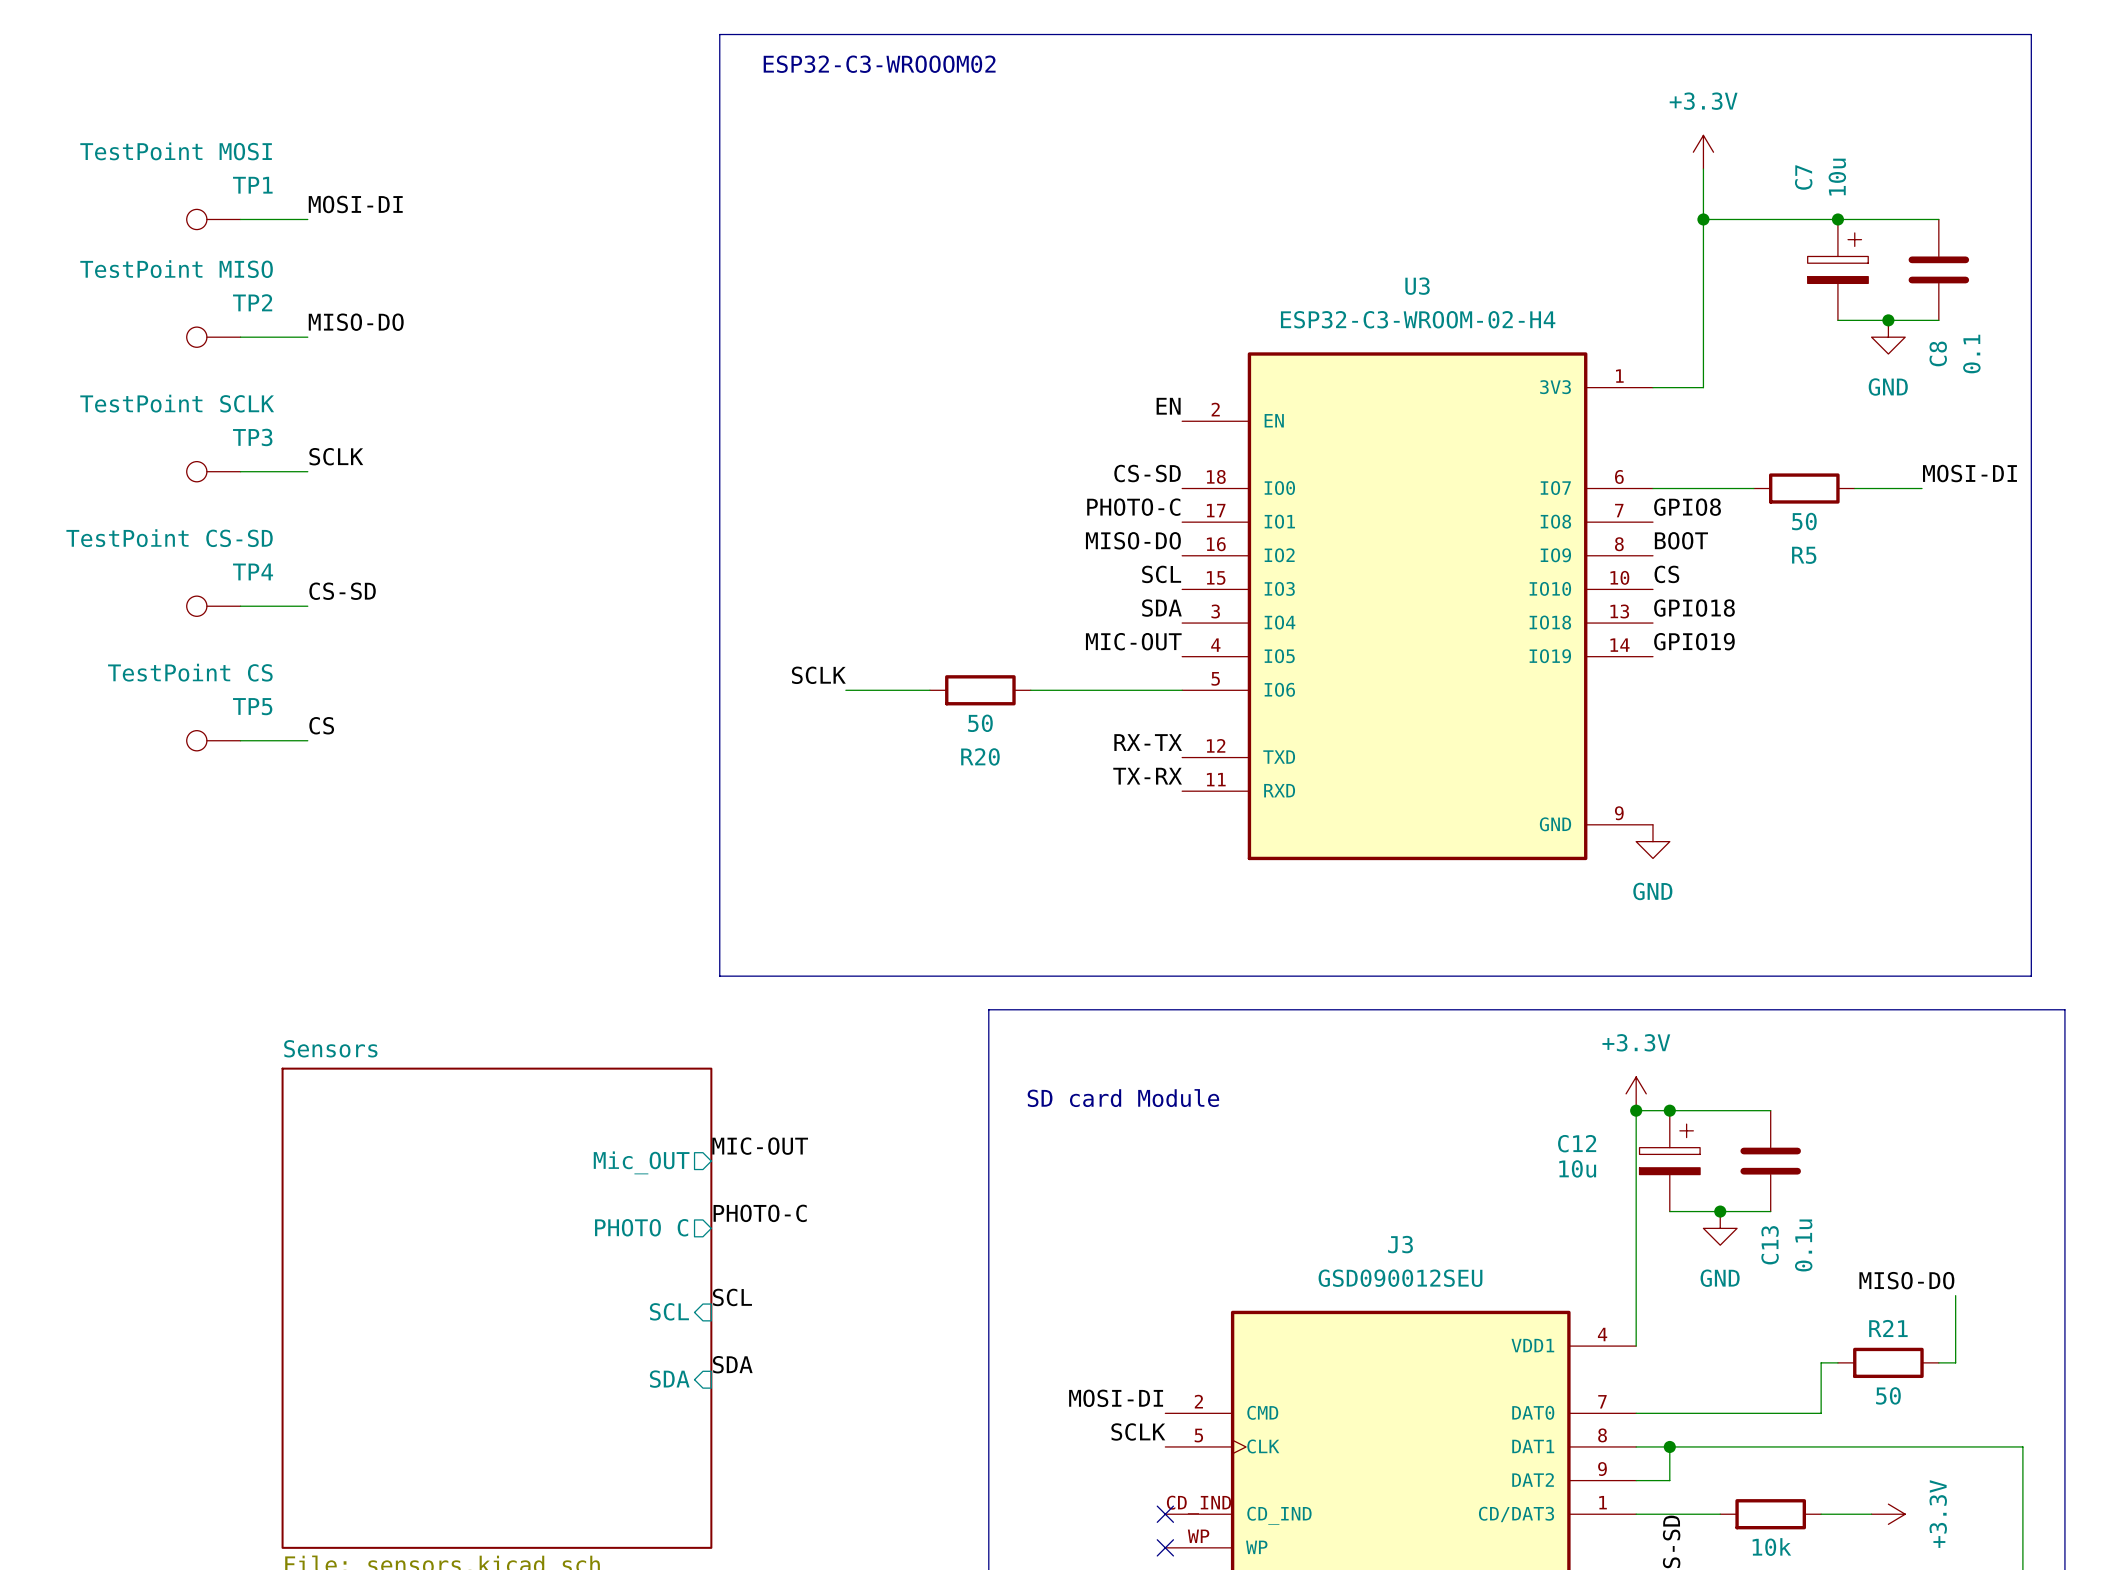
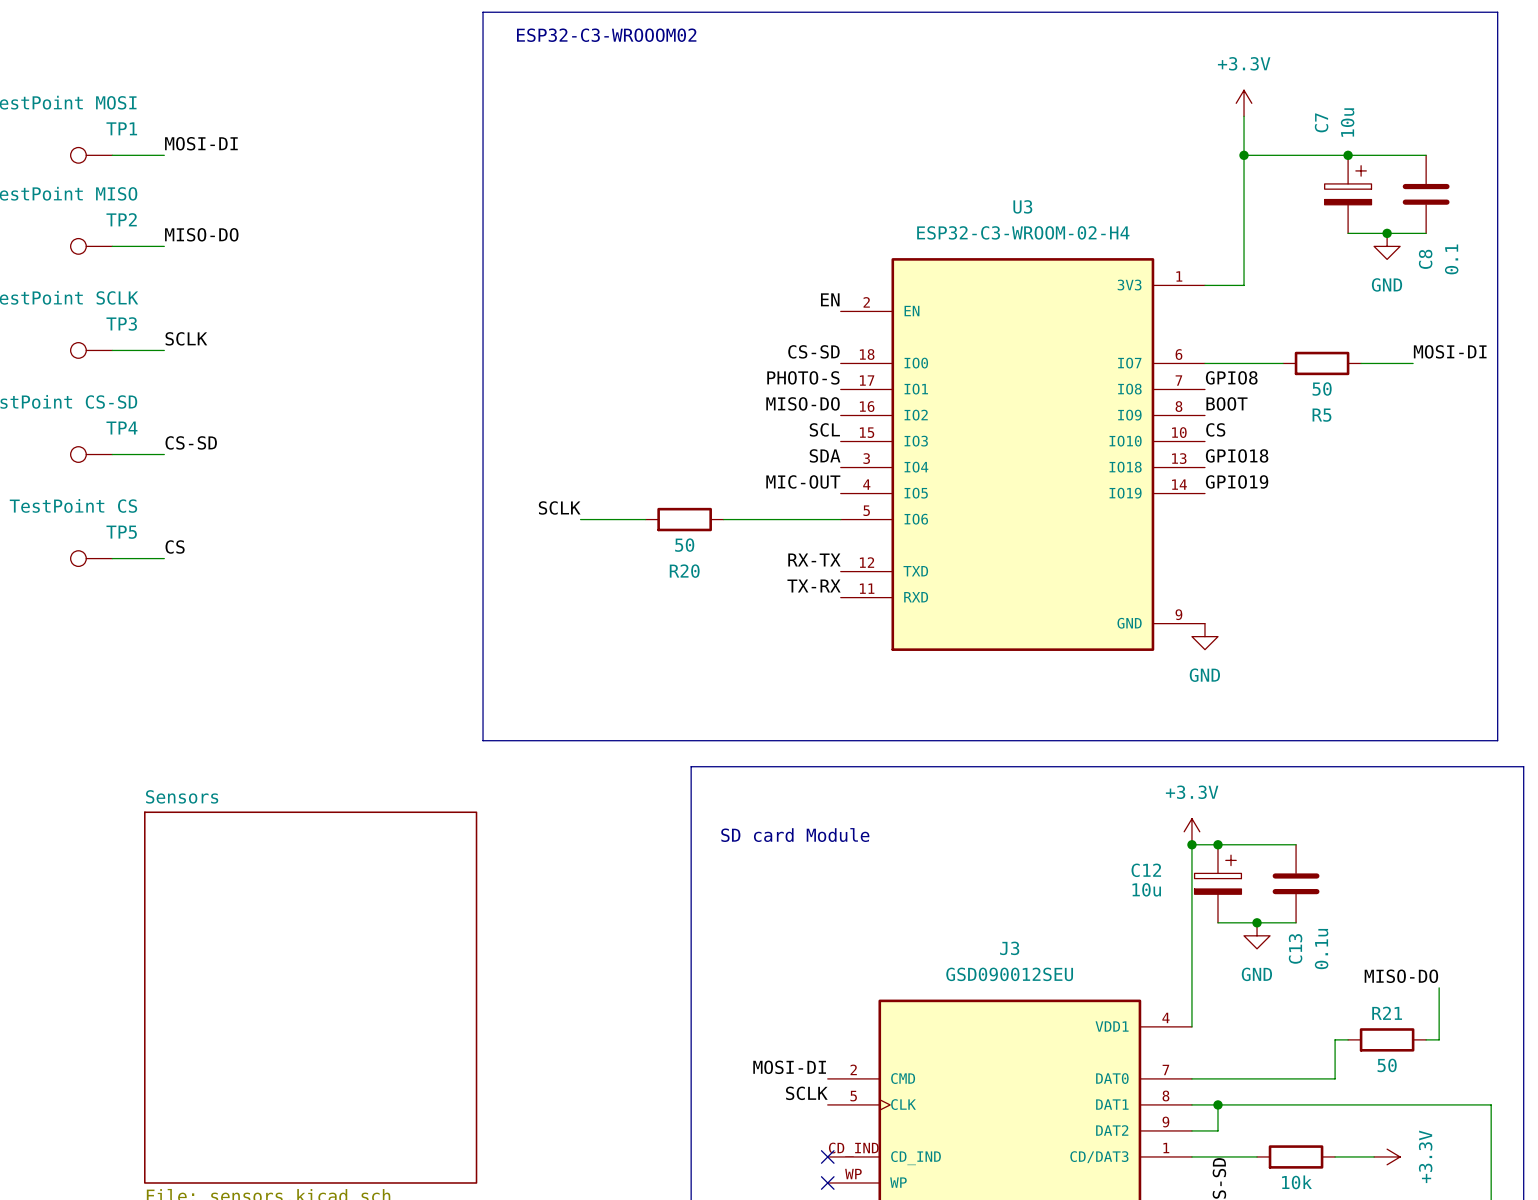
label: PHOTO-C (1133, 507) -> PHOTO-S (803, 377)
label: MIC-OUT (760, 1146) -> none
sheet pin: Mic_OUT (641, 1162) -> none
label: PHOTO-C (760, 1213) -> none
sheet pin: PHOTO C (641, 1227) -> none
label: SCL (732, 1297) -> none
sheet pin: SCL (669, 1311) -> none
label: SDA (732, 1364) -> none
sheet pin: SDA (669, 1379) -> none

